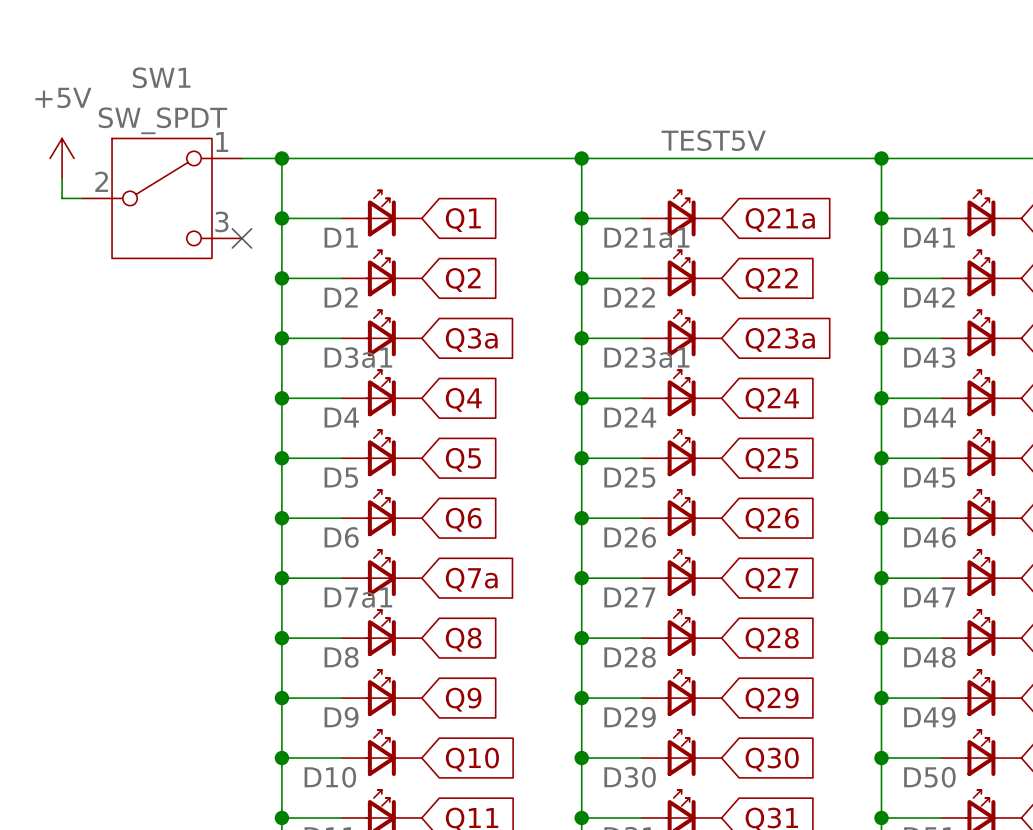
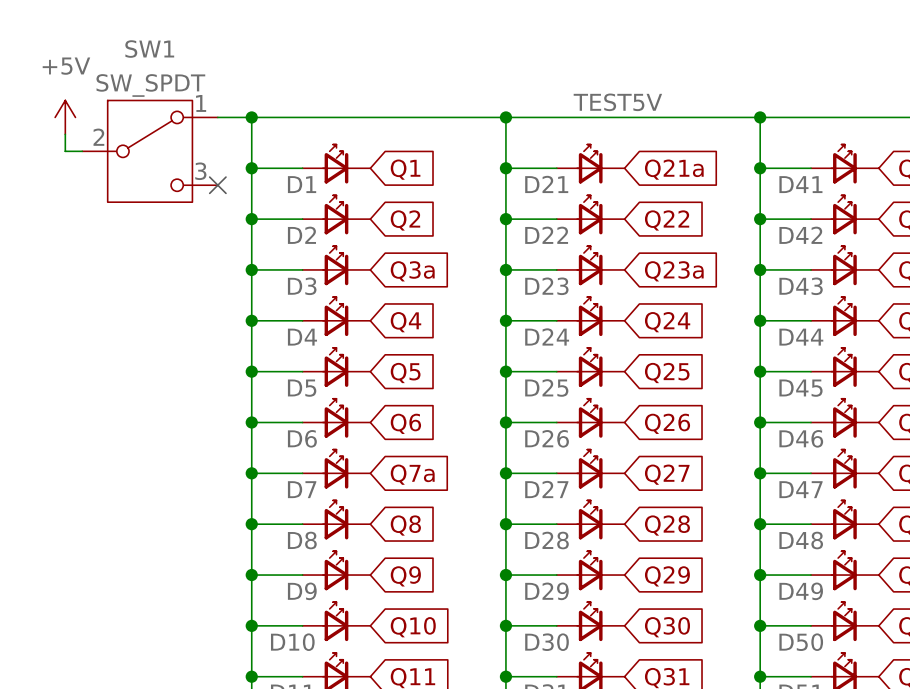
D21a1 name: D21a1 (646, 237) -> D21 (546, 184)
D3a1 name: D3a1 (358, 357) -> D3 (302, 286)
D23a1 name: D23a1 (646, 357) -> D23 (546, 286)
D7a1 name: D7a1 (358, 597) -> D7 (302, 489)

